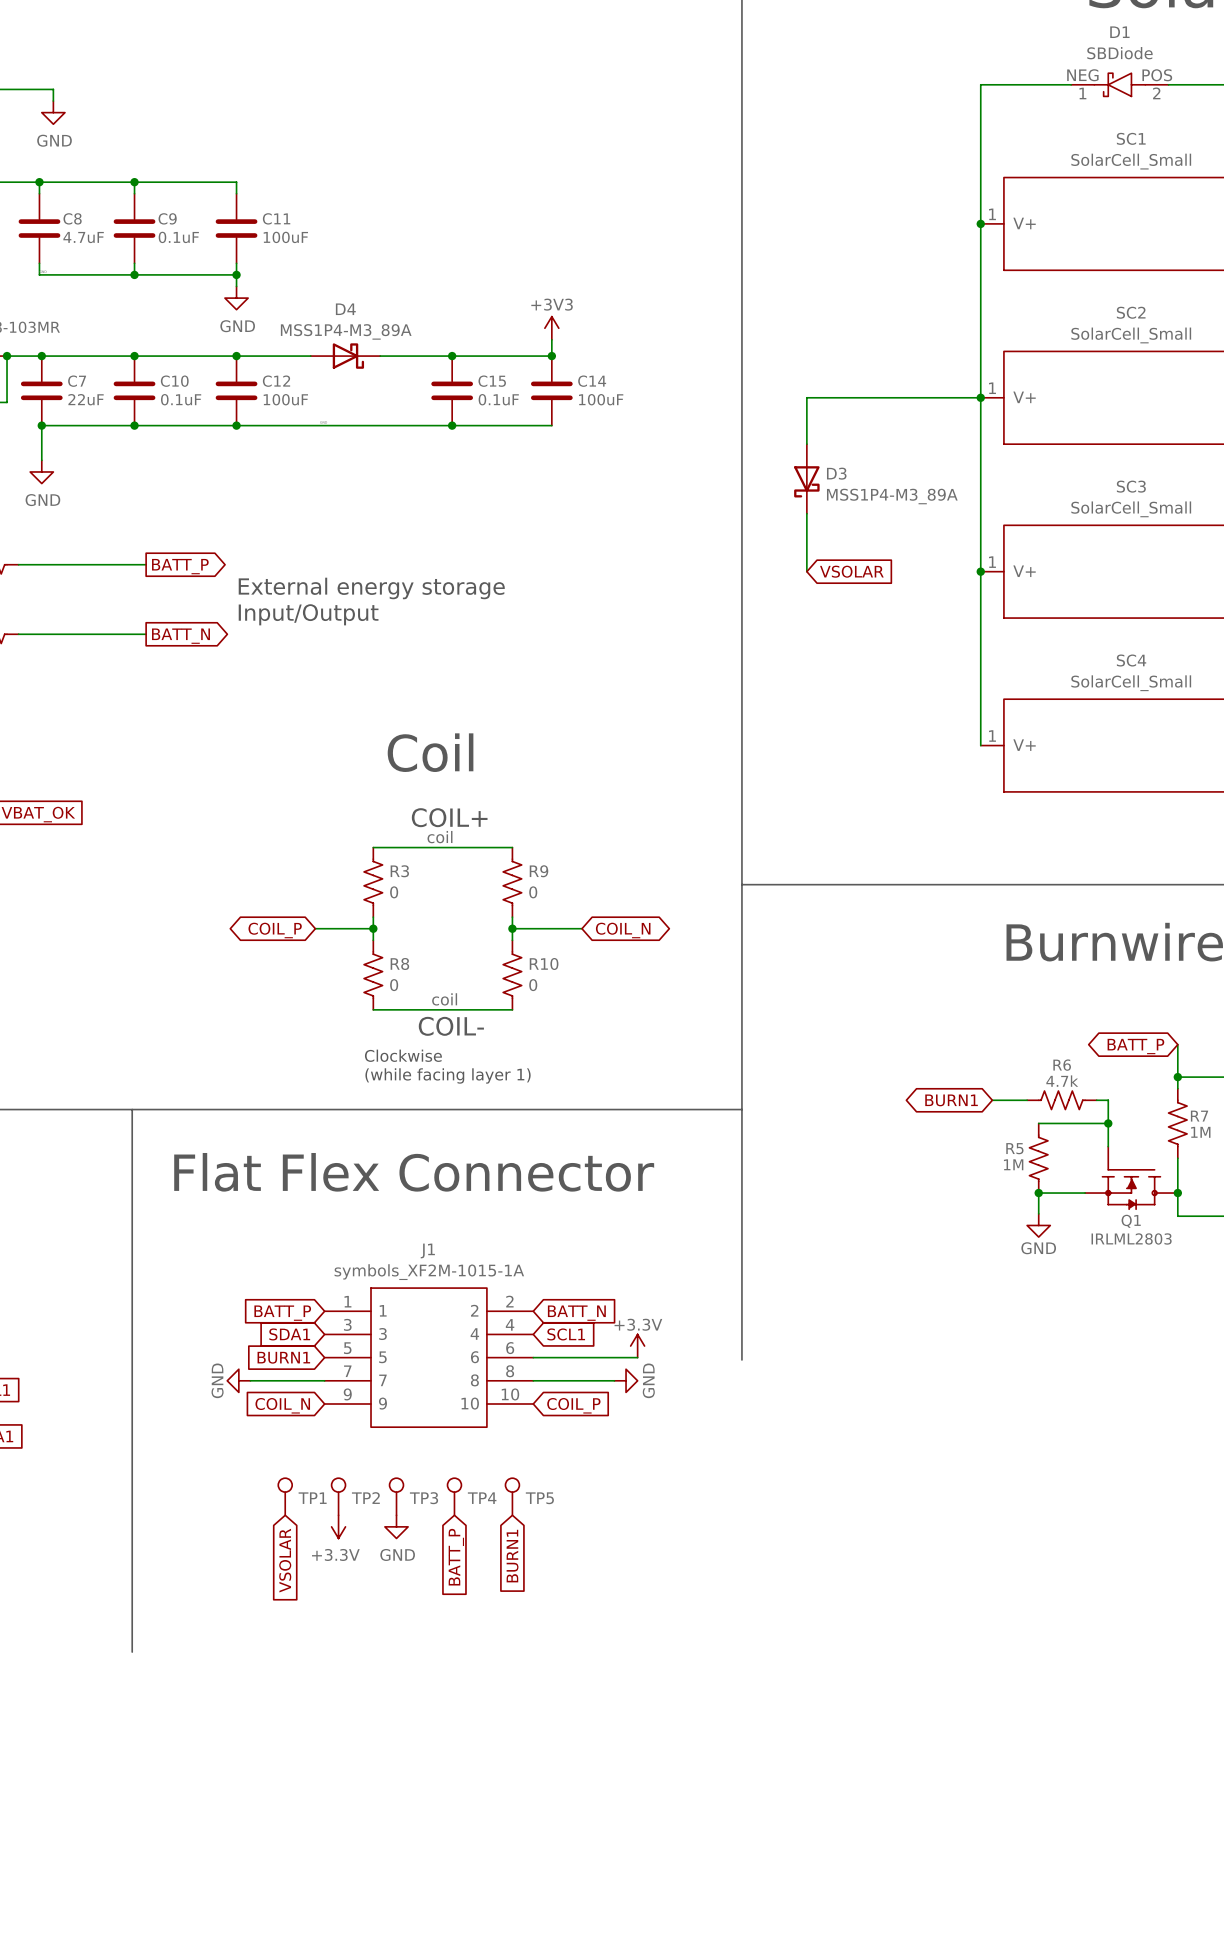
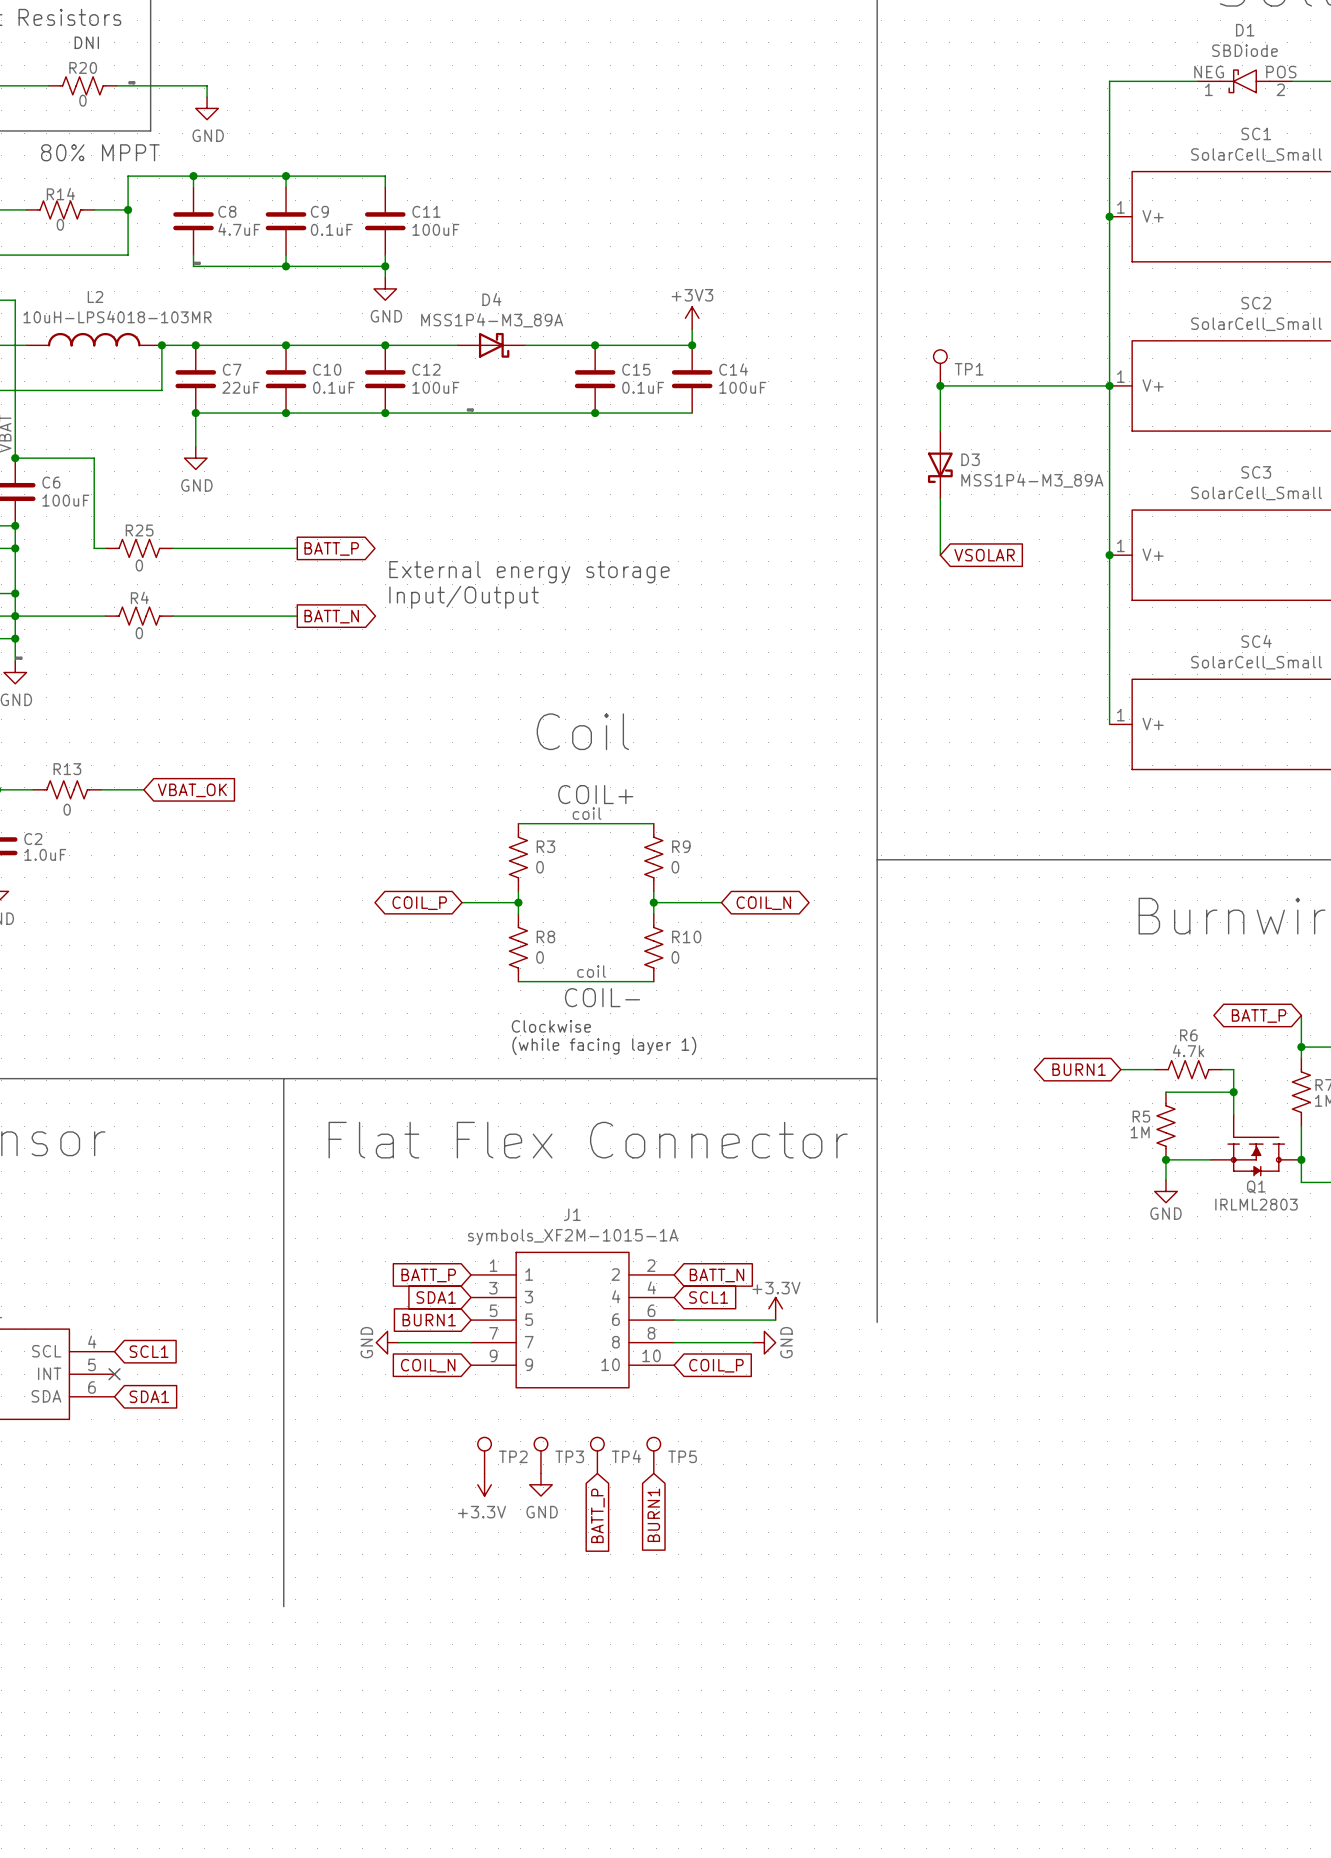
junction: none -> (940, 385)
TP1 position: (285, 1496) -> (940, 367)
global label: VSOLAR (285, 1560) -> none

